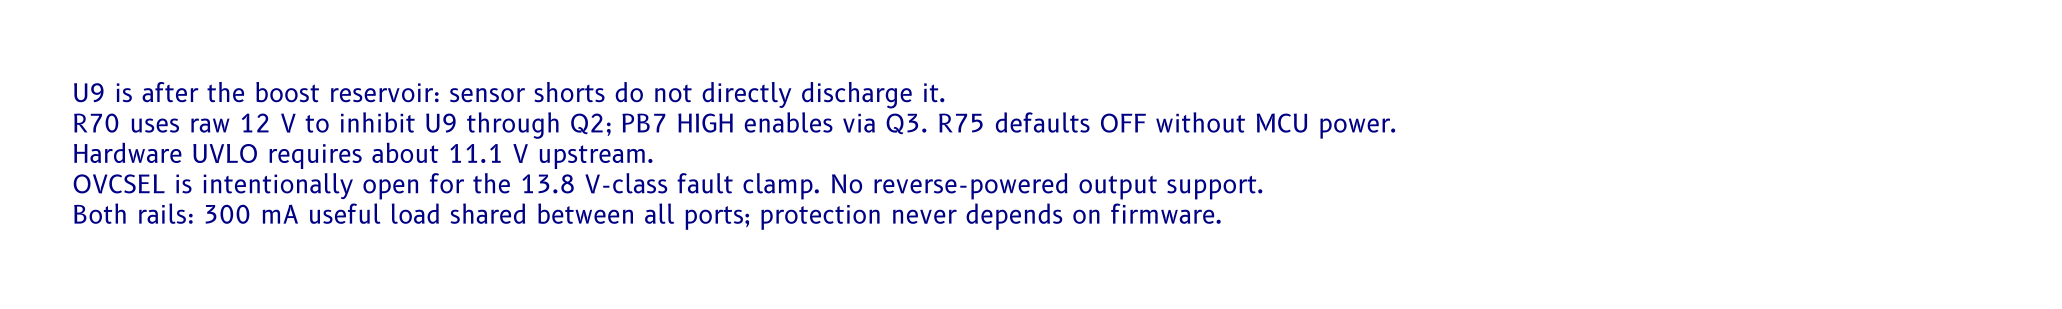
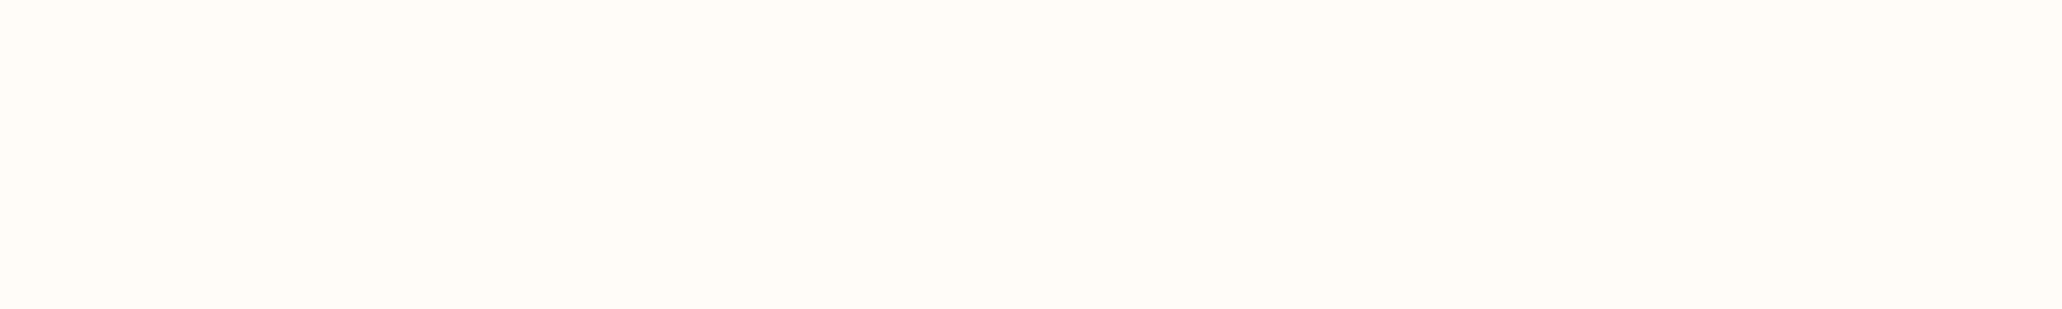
text: U9 is after the boost reservoir: sensor shorts do not directly discharge it. (509, 95) -> none
text: R70 uses raw 12 V to inhibit U9 through Q2; PB7 HIGH enables via Q3. R75 defaults OFF without MCU power. (734, 125) -> none
text: Hardware UVLO requires about 11.1 V upstream. (363, 155) -> none
text: OVCSEL is intentionally open for the 13.8 V-class fault clamp. No reverse-powered output support. (668, 186) -> none
text: Both rails: 300 mA useful load shared between all ports; protection never depends on firmware. (647, 216) -> none

